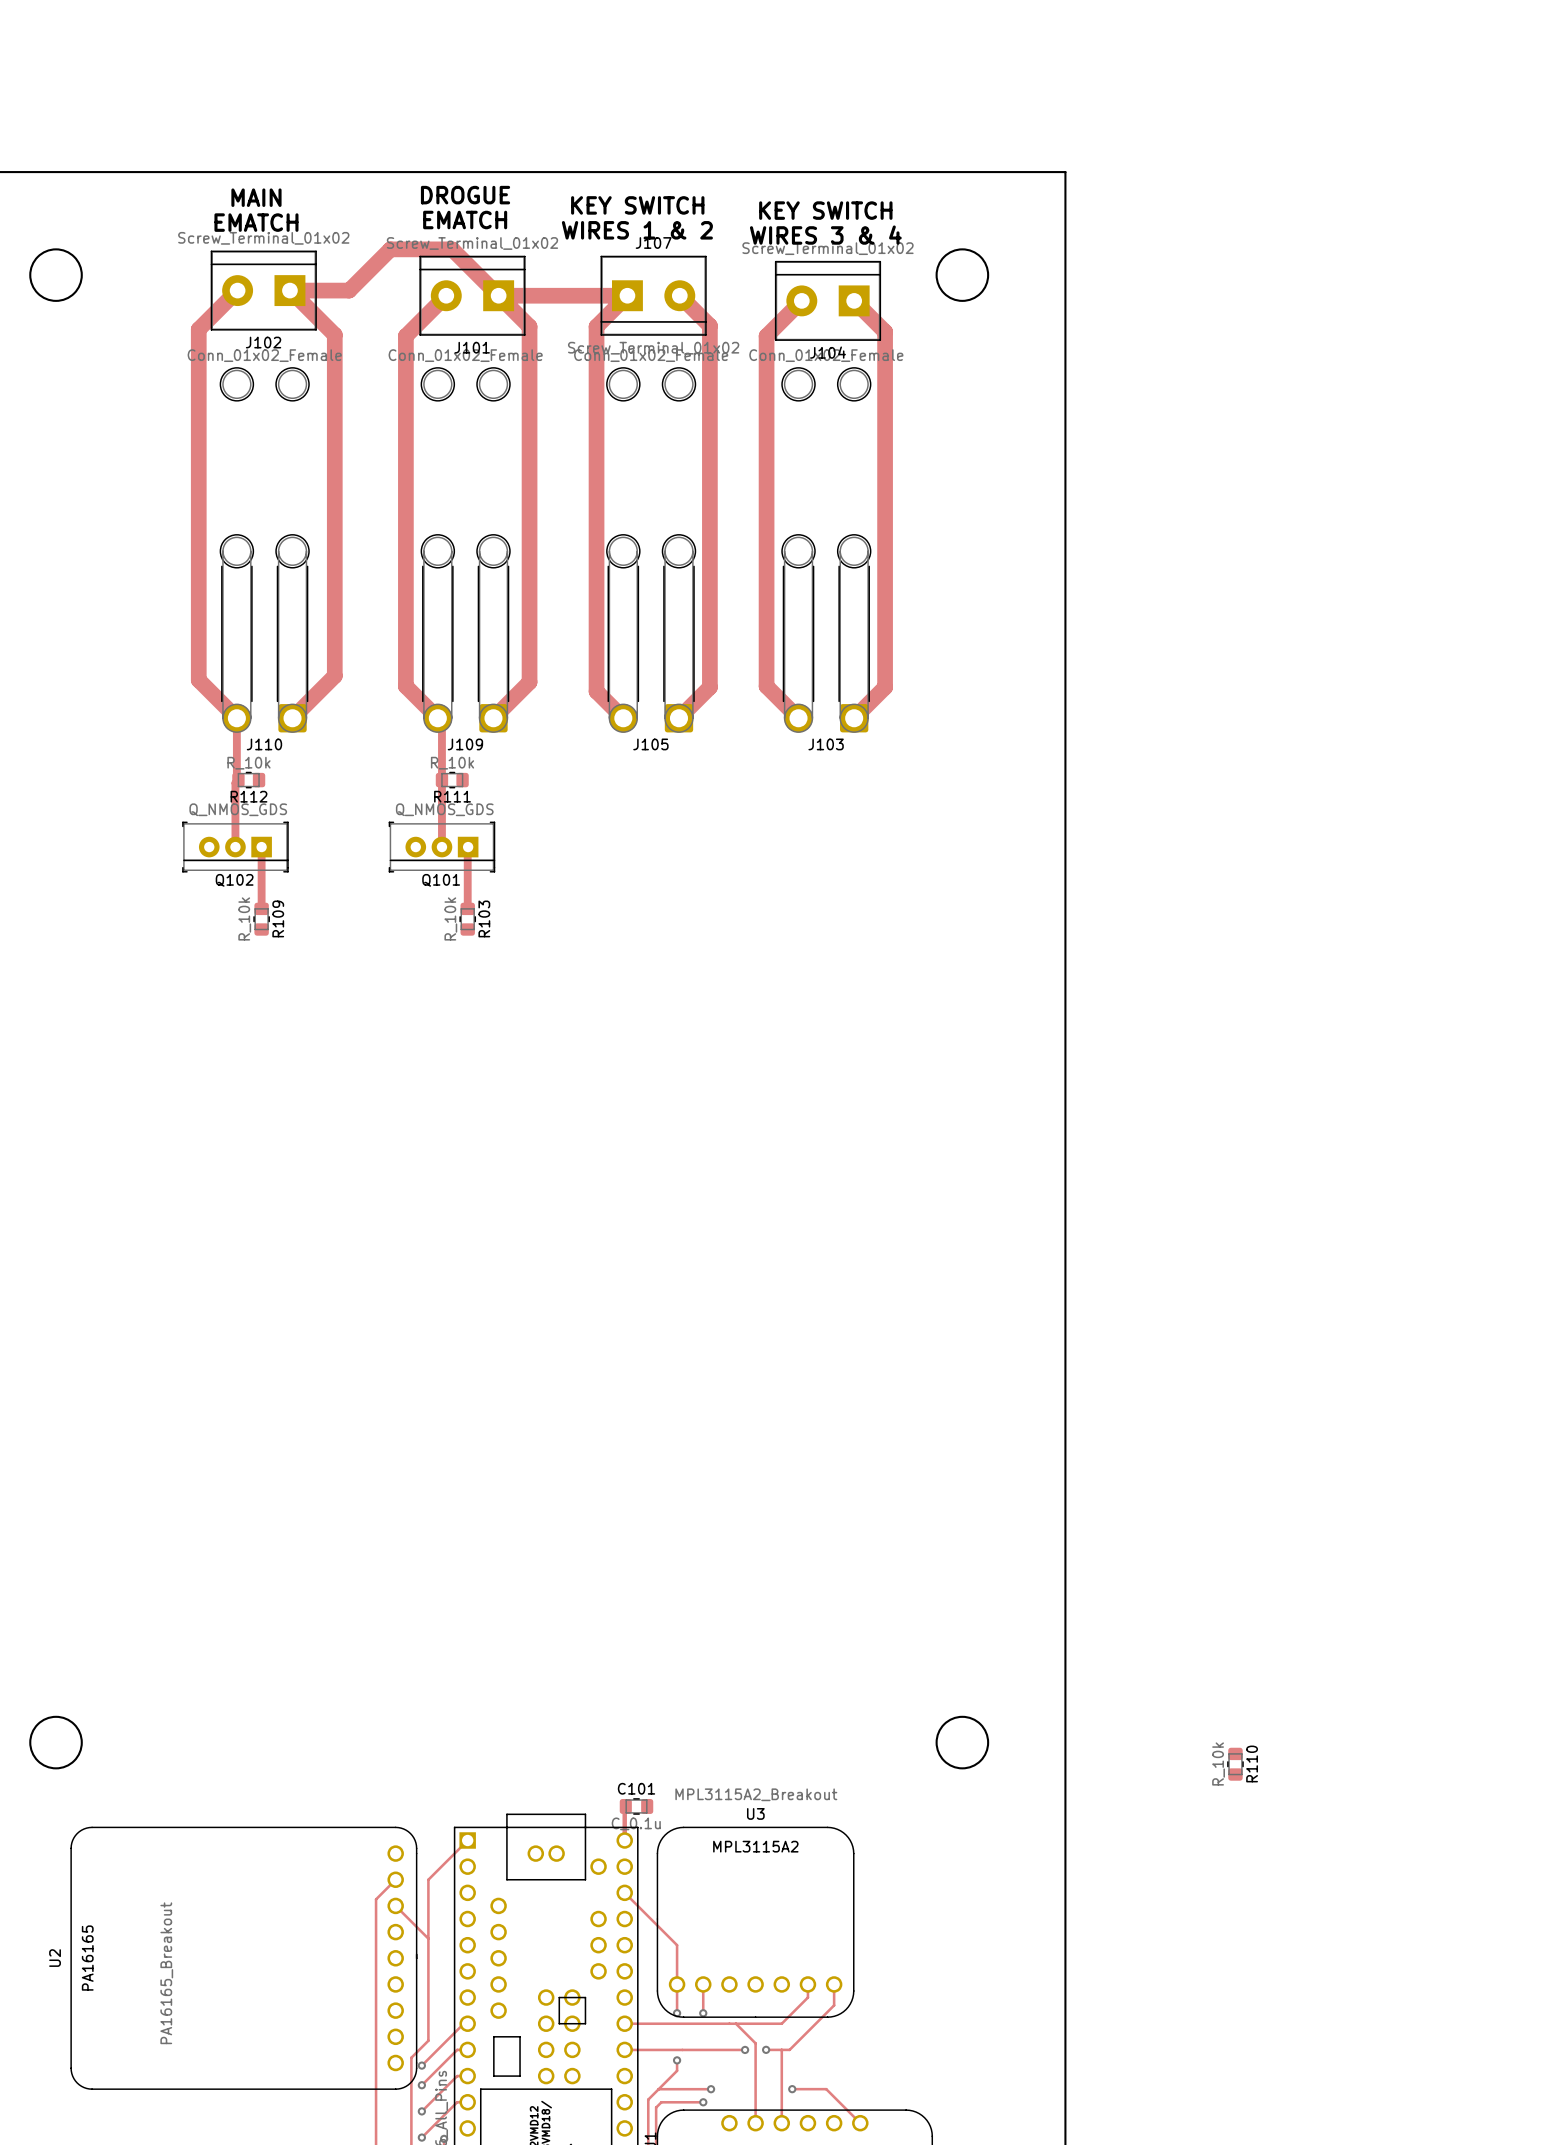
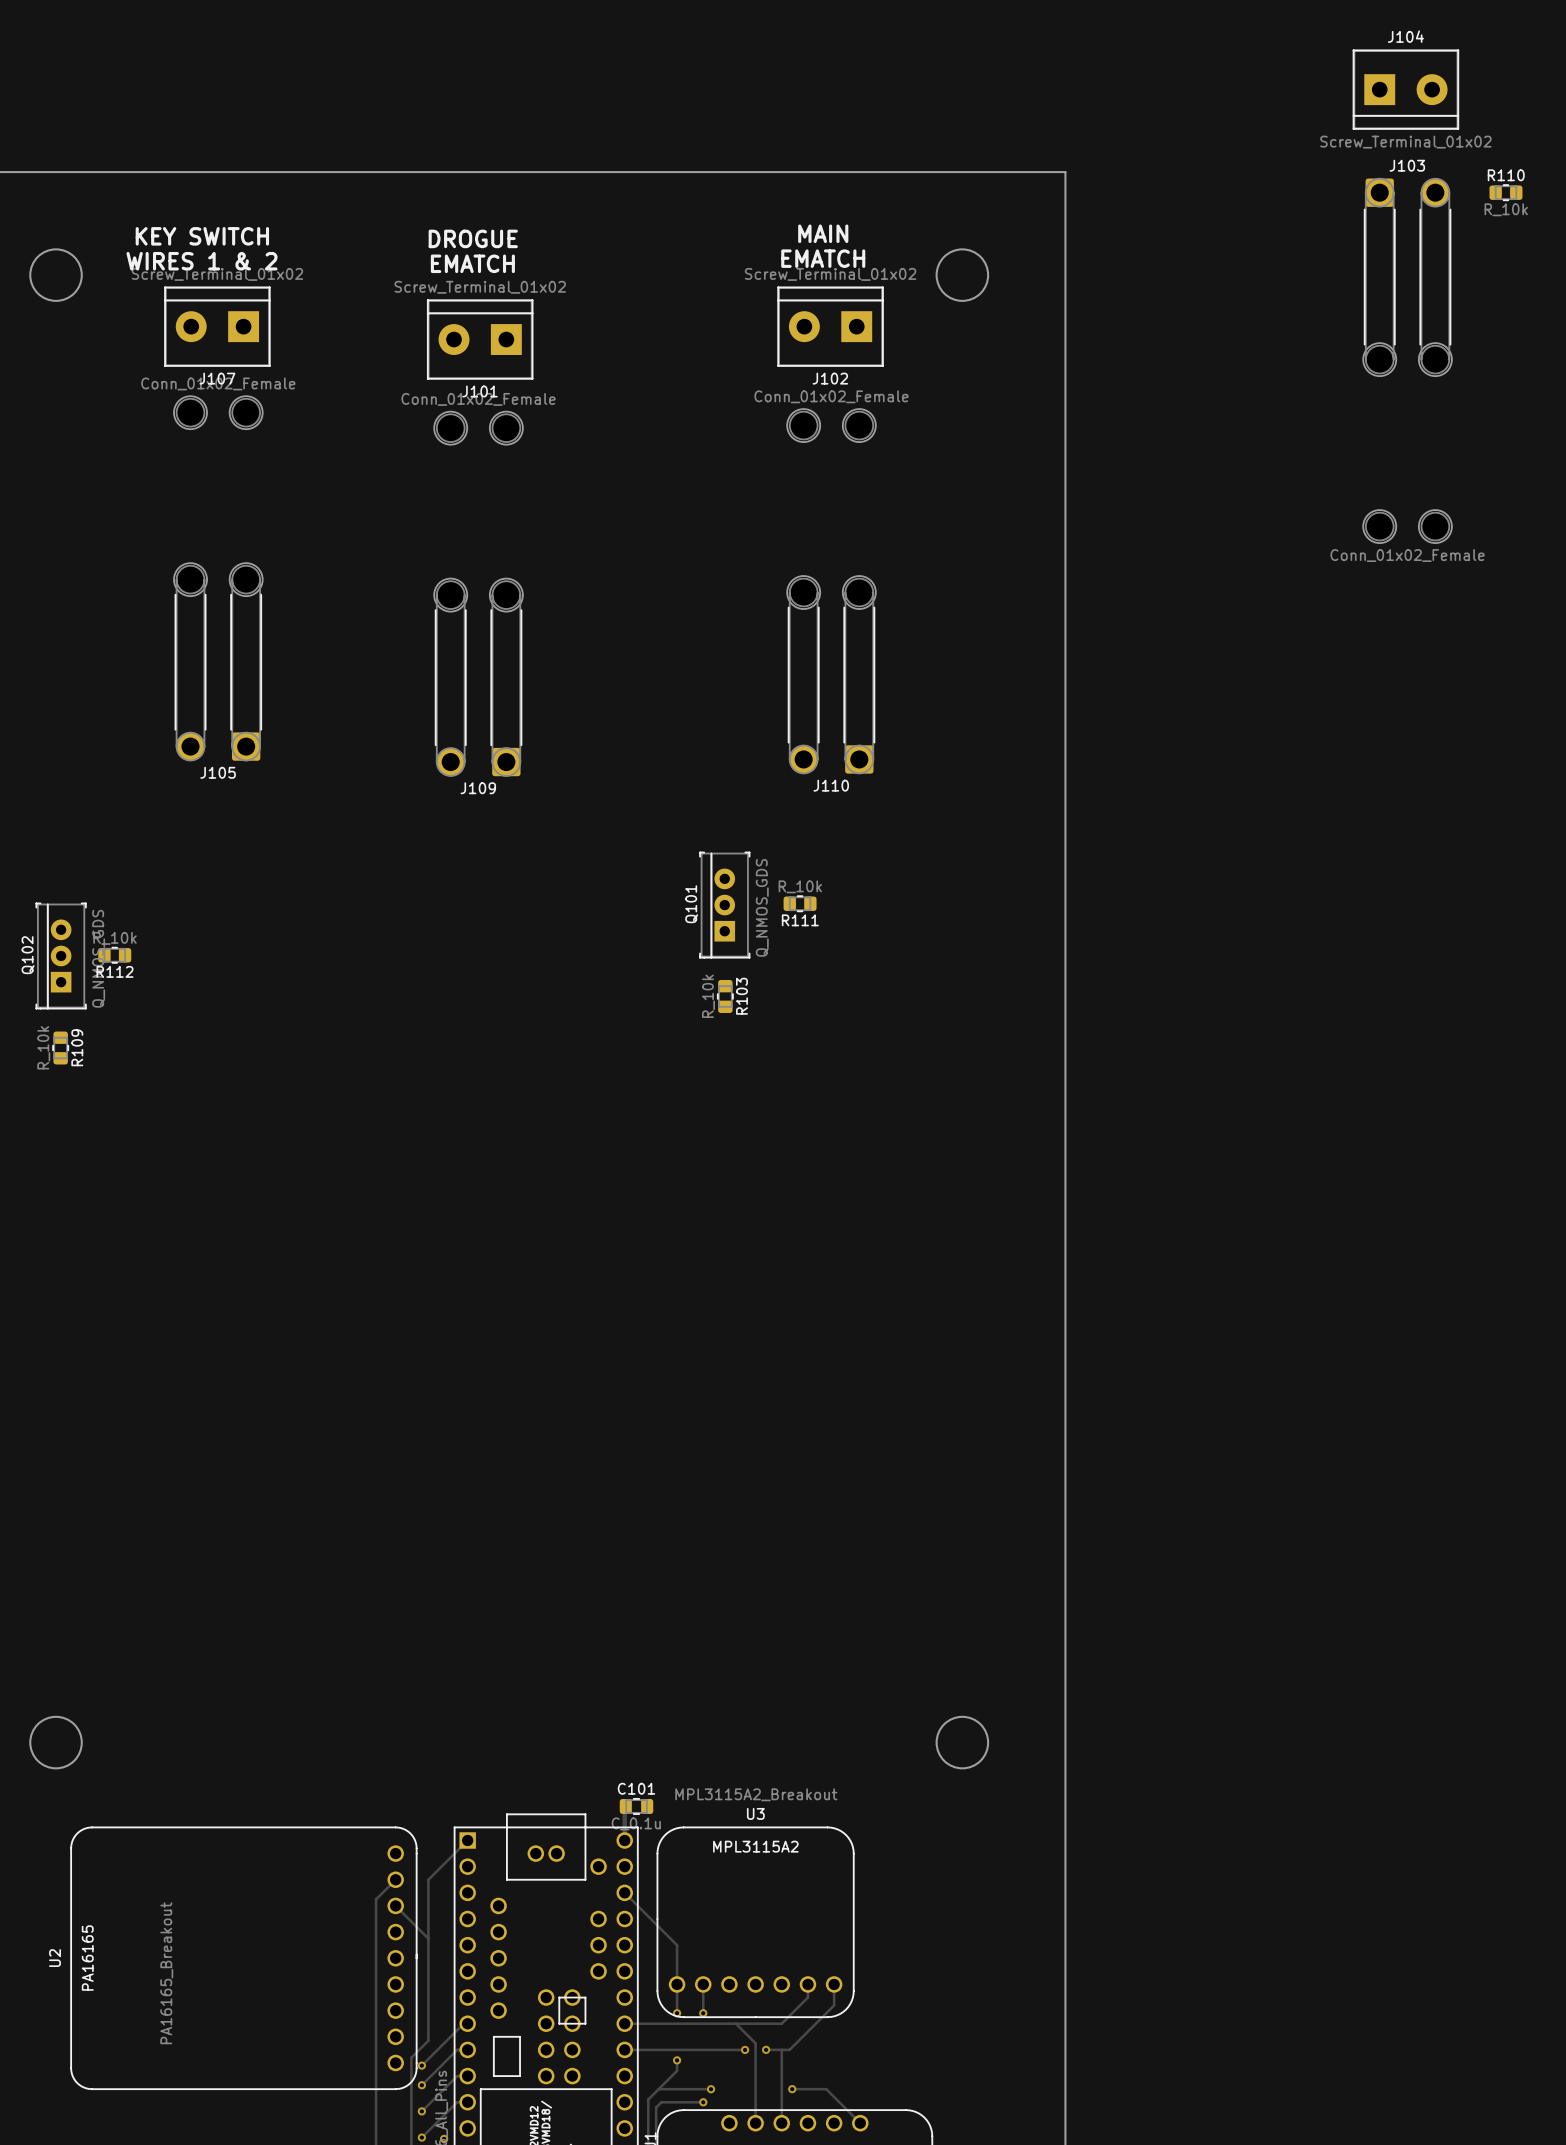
text position: DROGUE (465, 195) -> DROGUE (473, 238)
text: MAIN (256, 197) -> none
text: KEY SWITCH (637, 205) -> none
text: KEY SWITCH (825, 210) -> none
text position: EMATCH (465, 220) -> EMATCH (472, 263)
text: EMATCH (256, 222) -> none
text: WIRES 1 & 2 (637, 230) -> none
text: WIRES 3 & 4 (825, 235) -> MAIN (823, 233)
text: none -> KEY SWITCH (202, 236)
text: none -> EMATCH (823, 258)
text: none -> WIRES 1 & 2 (201, 261)
track: (237, 290) (198, 329) (198, 680) (236, 718) (236, 778) (238, 780) (235, 783) (235, 847) -> none
J102 position: (263, 290) -> (830, 326)
track: (289, 290) (349, 290) (390, 249) (452, 249) (529, 326) (529, 682) (493, 718) -> none
track: (290, 290) (334, 334) (334, 675) (292, 718) -> none
track: (446, 295) (405, 336) (405, 686) (441, 722) (441, 847) -> none
J101 position: (472, 295) -> (480, 339)
track: (498, 295) (627, 295) (596, 326) (596, 691) (623, 718) -> none
J107 rotation: 0° (653, 295) -> 180° (217, 326)
J107 position: (653, 295) -> (217, 326)
track: (679, 295) (709, 325) (709, 687) (678, 718) -> none
track: (801, 300) (766, 336) (766, 686) (798, 718) -> none
J104 rotation: 0° (827, 300) -> 180° (1405, 89)
J104 position: (827, 300) -> (1405, 89)
track: (854, 300) (885, 331) (885, 687) (854, 718) -> none
J110 position: (264, 550) -> (831, 591)
J109 position: (465, 550) -> (478, 594)
J105 position: (651, 550) -> (218, 578)
J103 rotation: 0° (826, 550) -> 180° (1407, 360)
J103 position: (826, 550) -> (1407, 360)
R112 position: (248, 780) -> (114, 955)
R111 position: (452, 780) -> (800, 903)
Q102 rotation: 0° (235, 847) -> 90° clockwise (61, 955)
Q102 position: (235, 847) -> (61, 955)
track: (261, 847) (261, 908) -> none
Q101 rotation: 0° (441, 847) -> 90° clockwise (724, 905)
Q101 position: (441, 847) -> (724, 905)
track: (468, 847) (467, 908) -> none
R109 position: (261, 919) -> (60, 1048)
R103 position: (467, 919) -> (725, 996)
R110 value position: R_10k (1218, 1763) -> R_10k (1506, 209)
R110 name position: R110 (1252, 1763) -> R110 (1506, 175)
R110 rotation: 0° (1235, 1764) -> 90° clockwise (1505, 192)
R110 position: (1235, 1764) -> (1505, 192)

